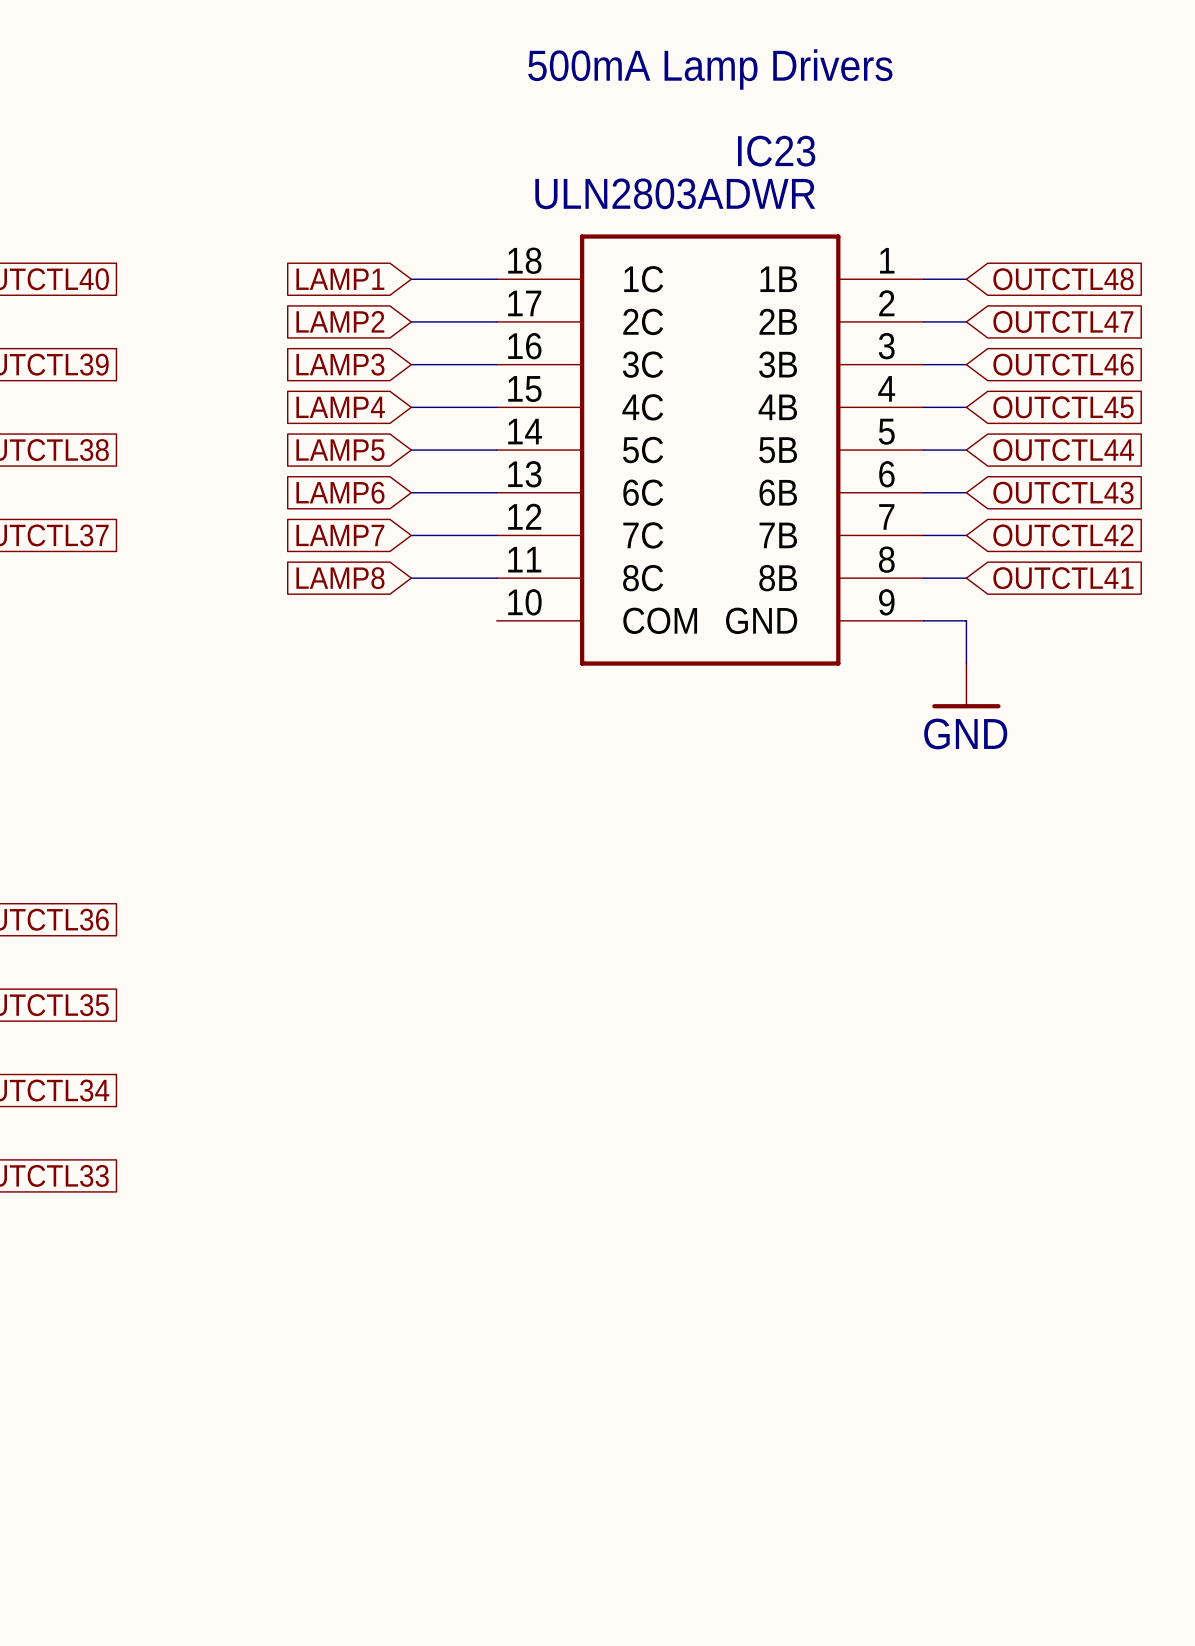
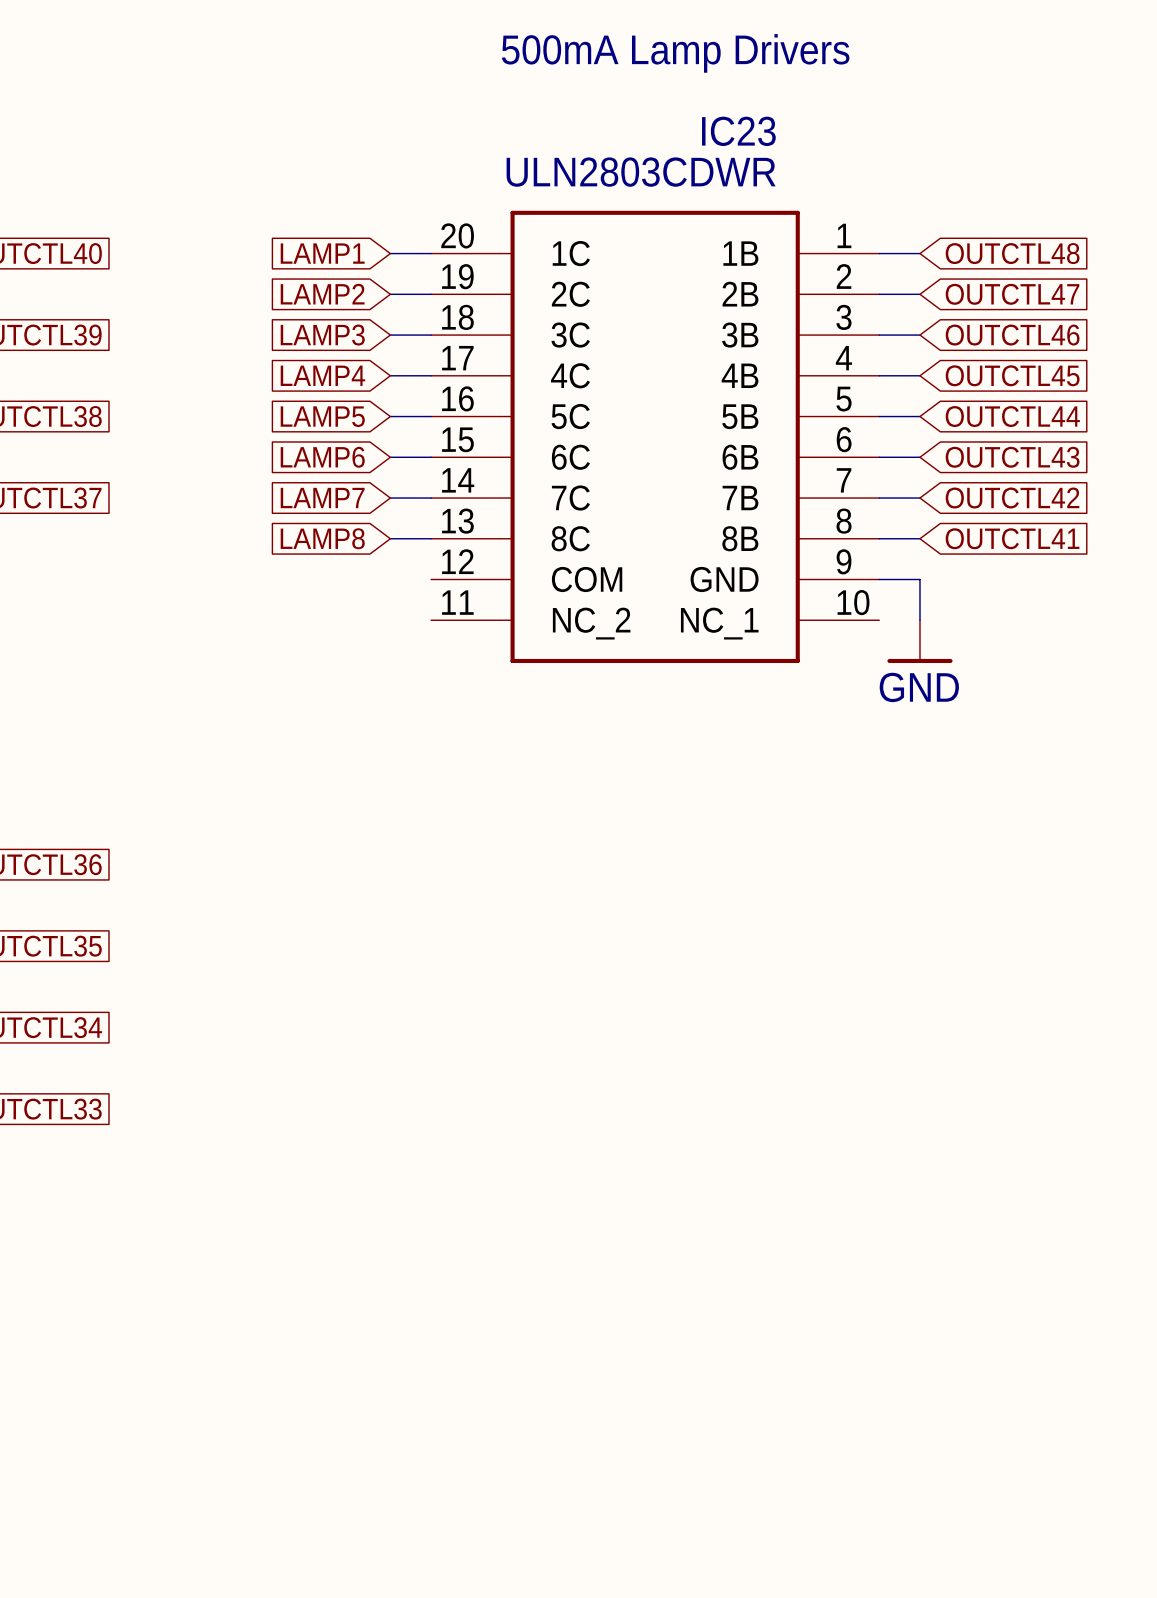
IC23 value: ULN2803ADWR (675, 193) -> ULN2803CDWR (641, 172)
IC23 symbol: [496, 234, 924, 666] -> [431, 210, 880, 664]

